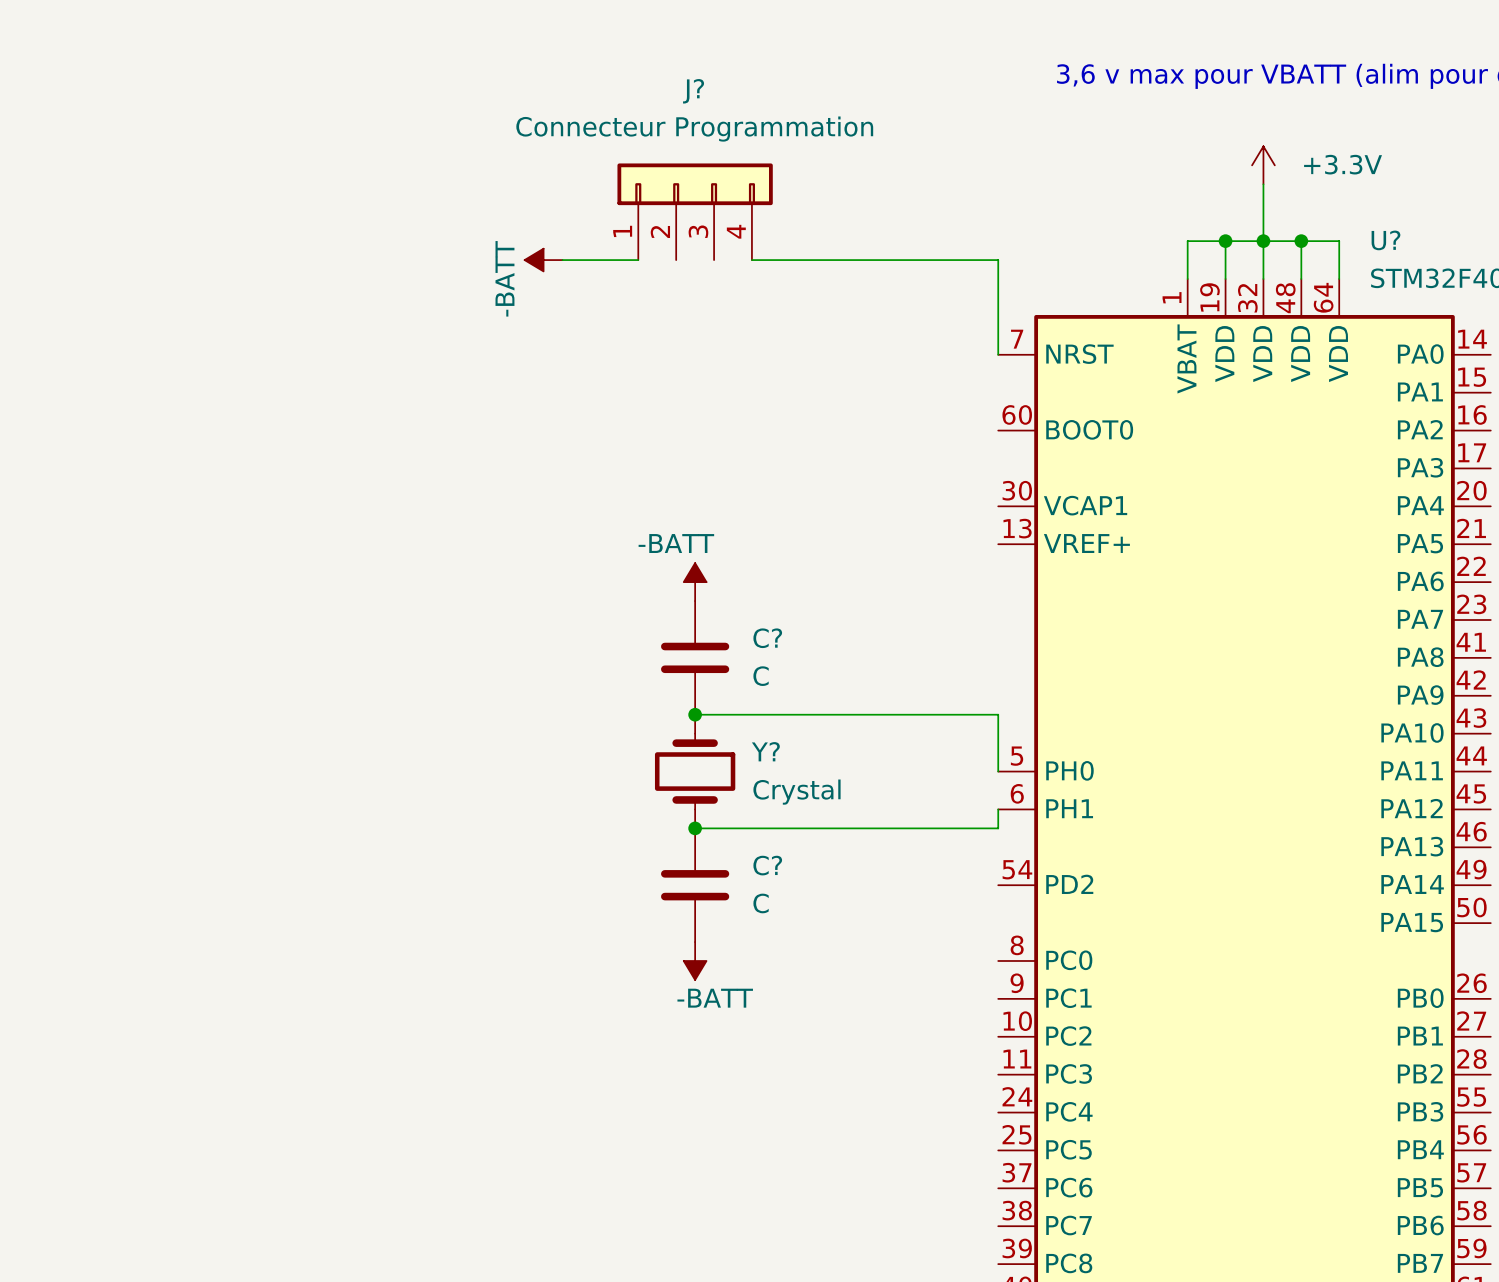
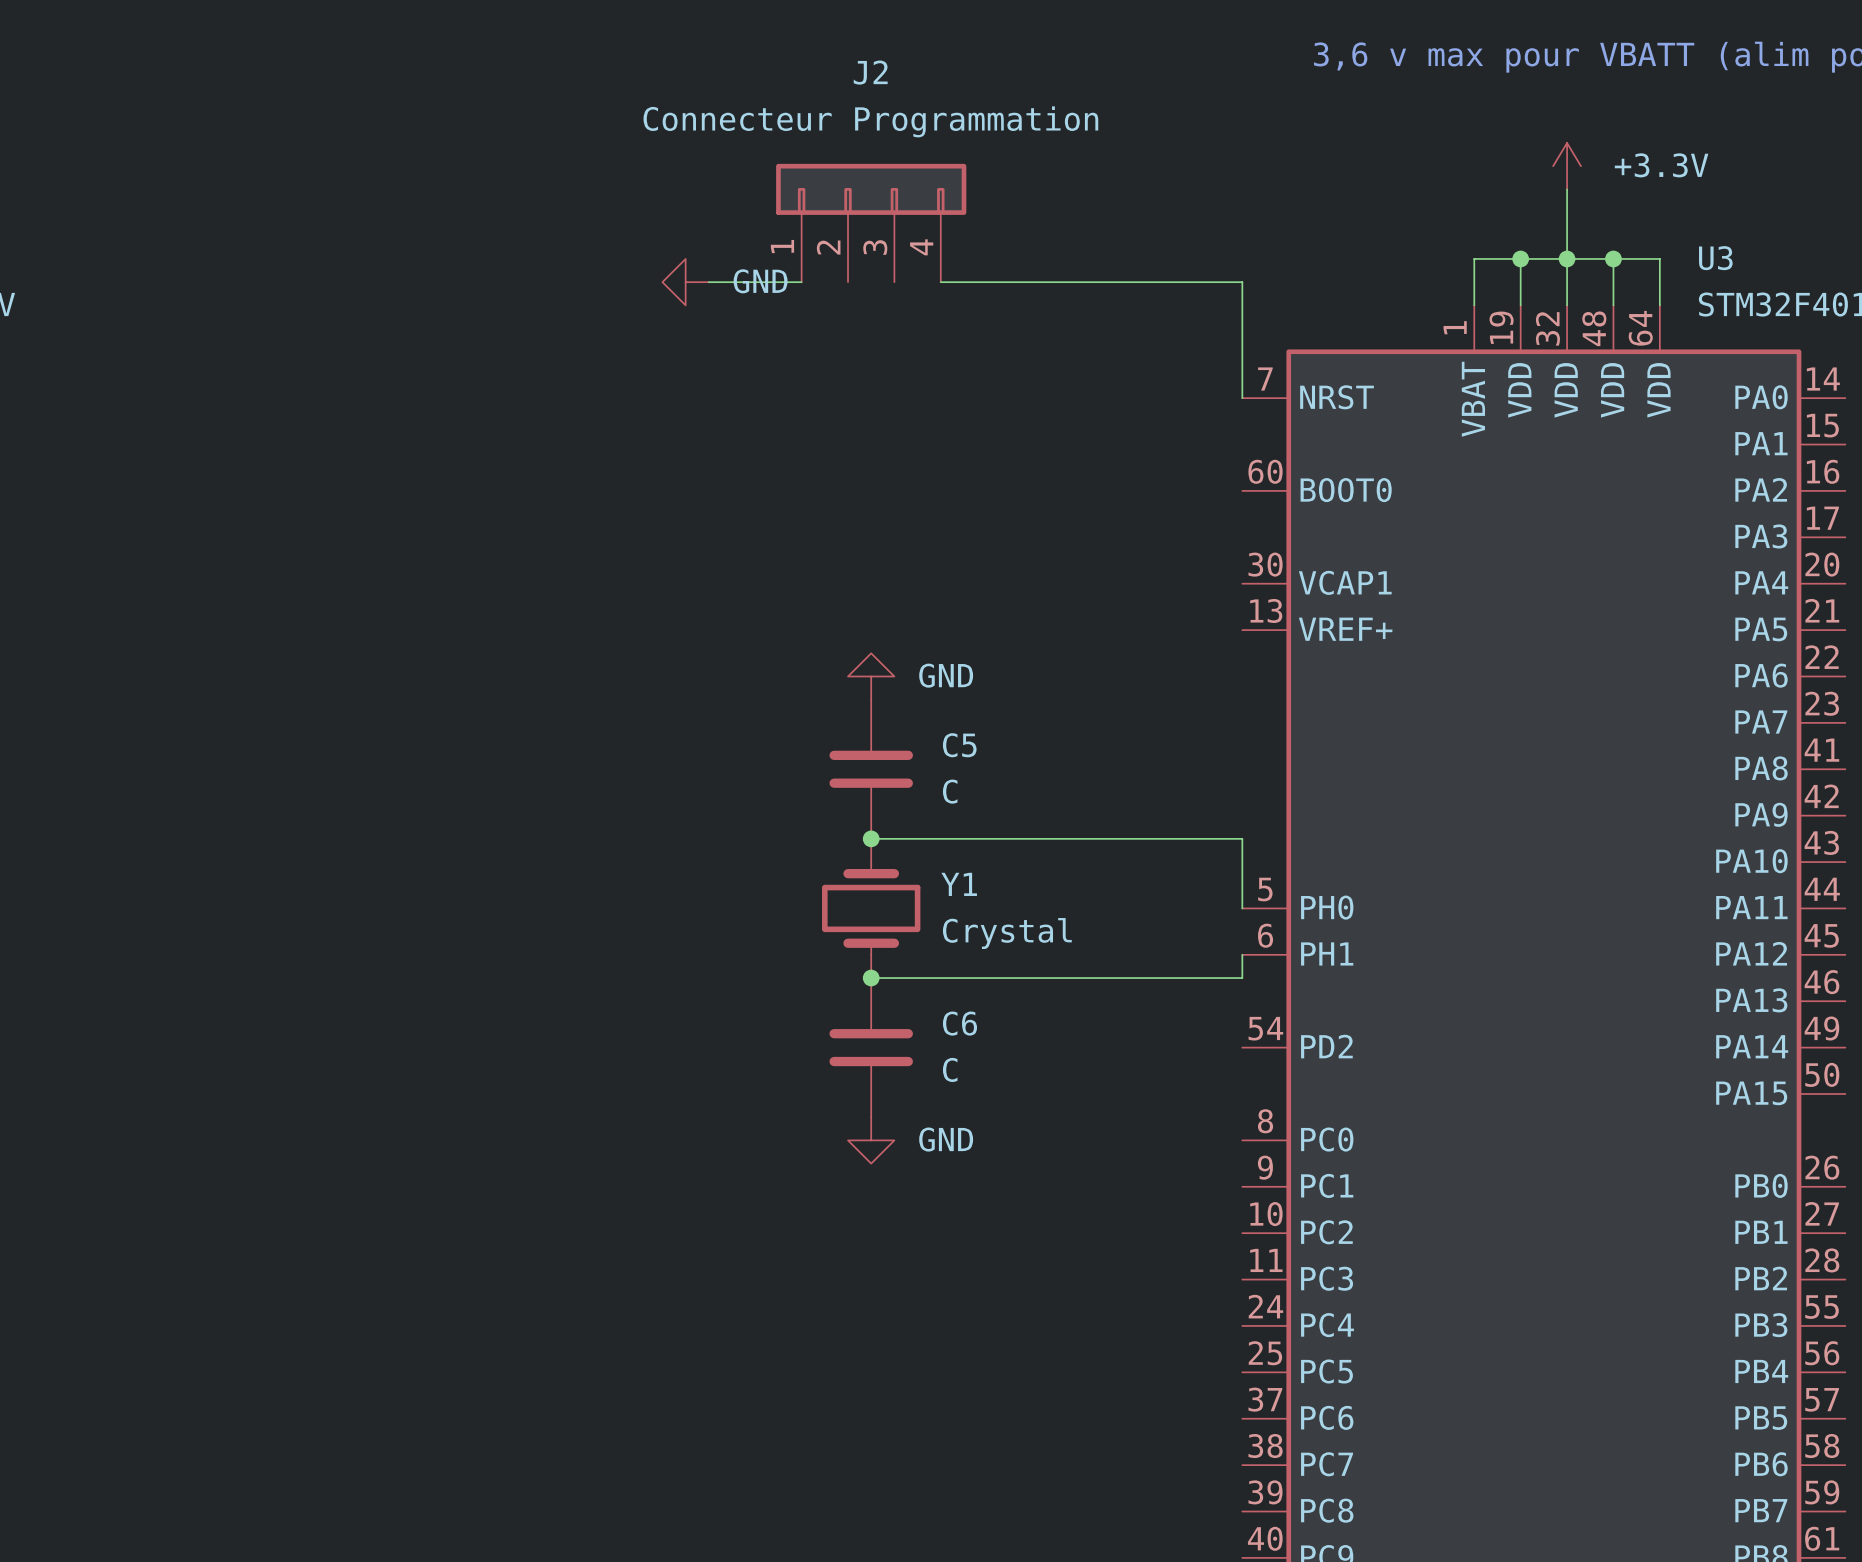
J? name: J? (693, 91) -> J2 (870, 72)
U? name: U? (1385, 240) -> U3 (1715, 258)
power symbol: -BATT (543, 260) -> GND (685, 282)
power symbol: -BATT (695, 582) -> GND (871, 676)
C? name: C? (767, 638) -> C5 (959, 745)
Y? name: Y? (765, 751) -> Y1 (959, 884)
C? name: C? (767, 865) -> C6 (959, 1023)
power symbol: -BATT (695, 960) -> GND (871, 1140)

